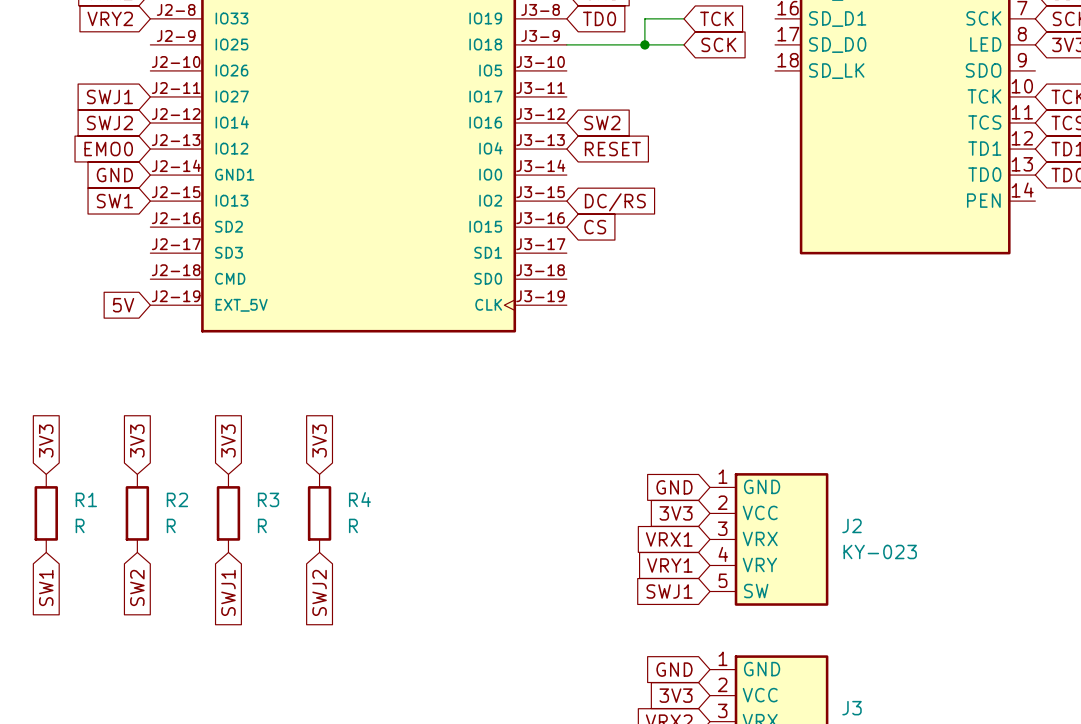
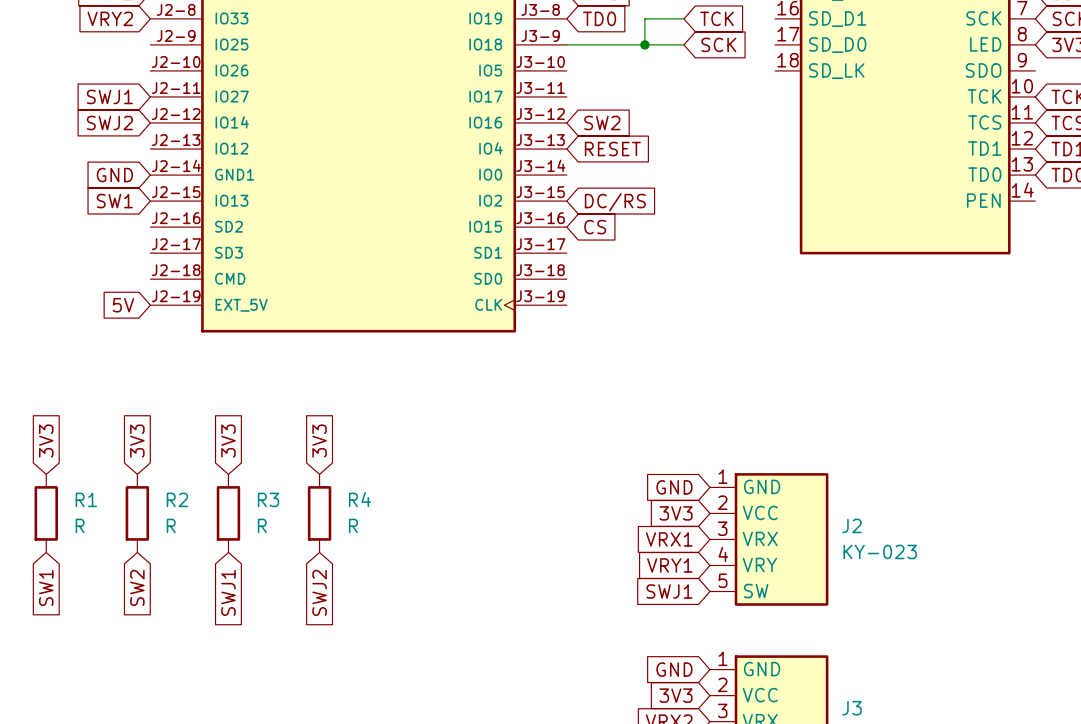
global label: EMO0 (108, 149) -> none

